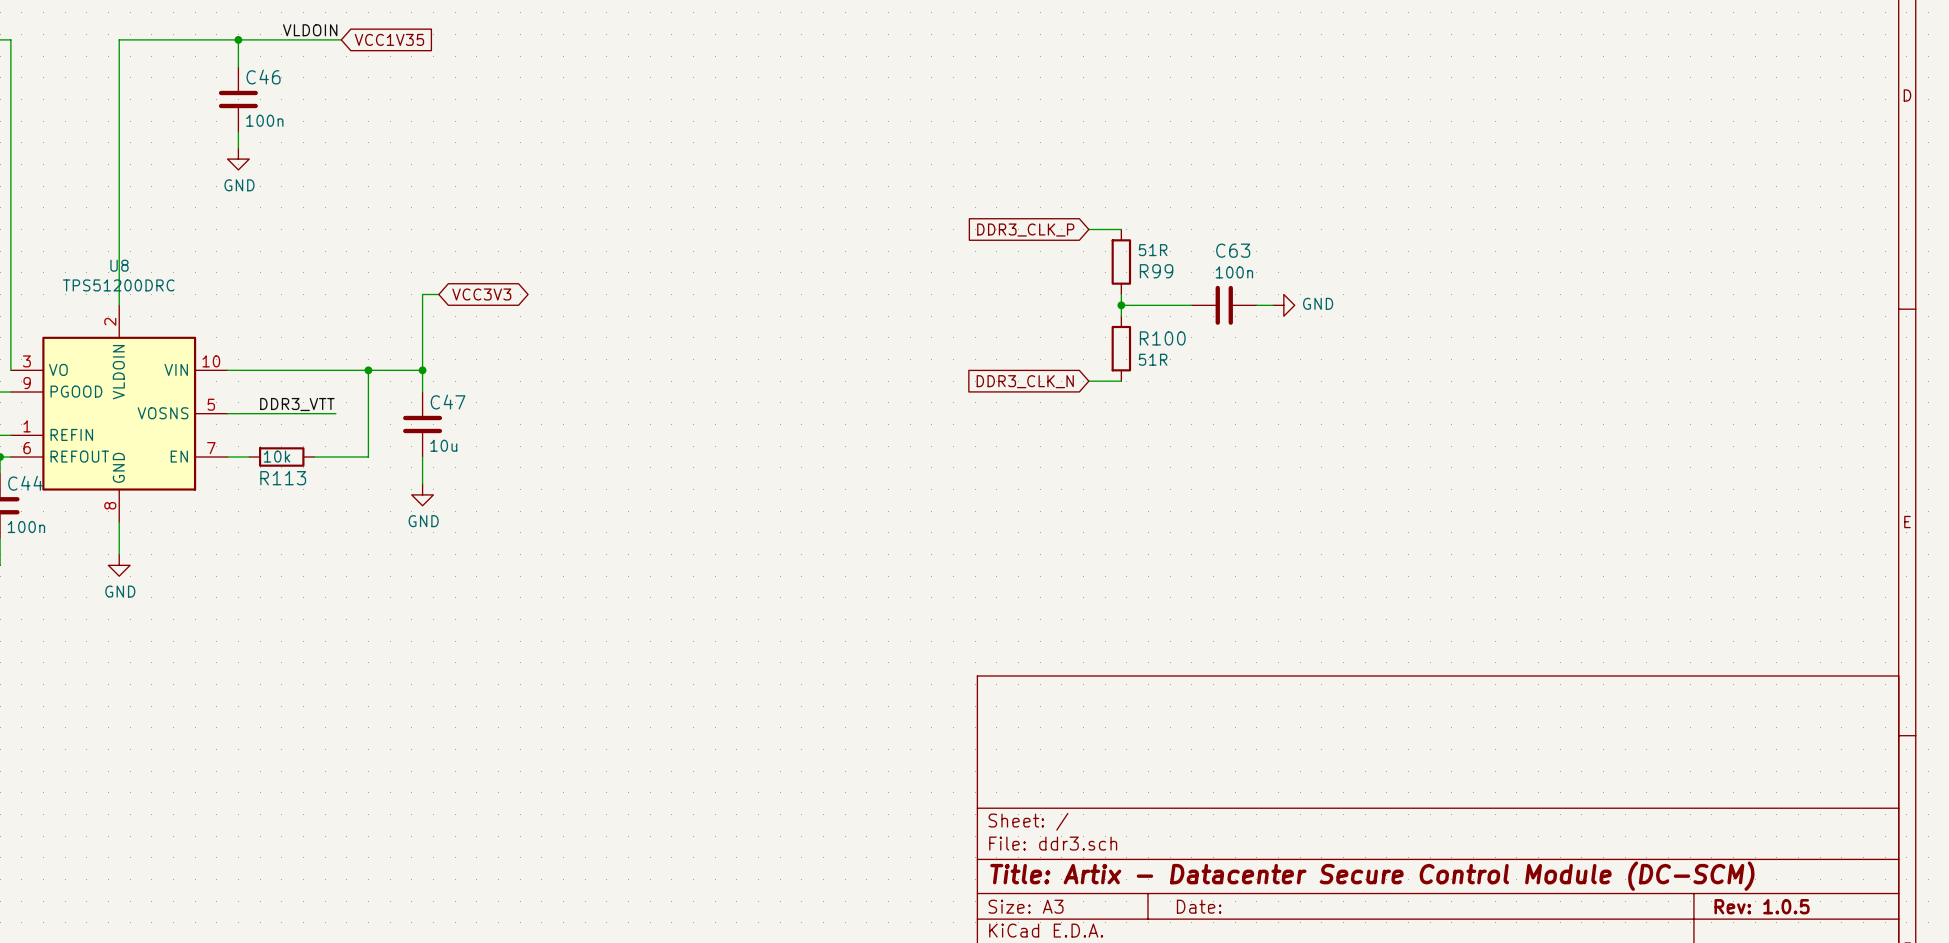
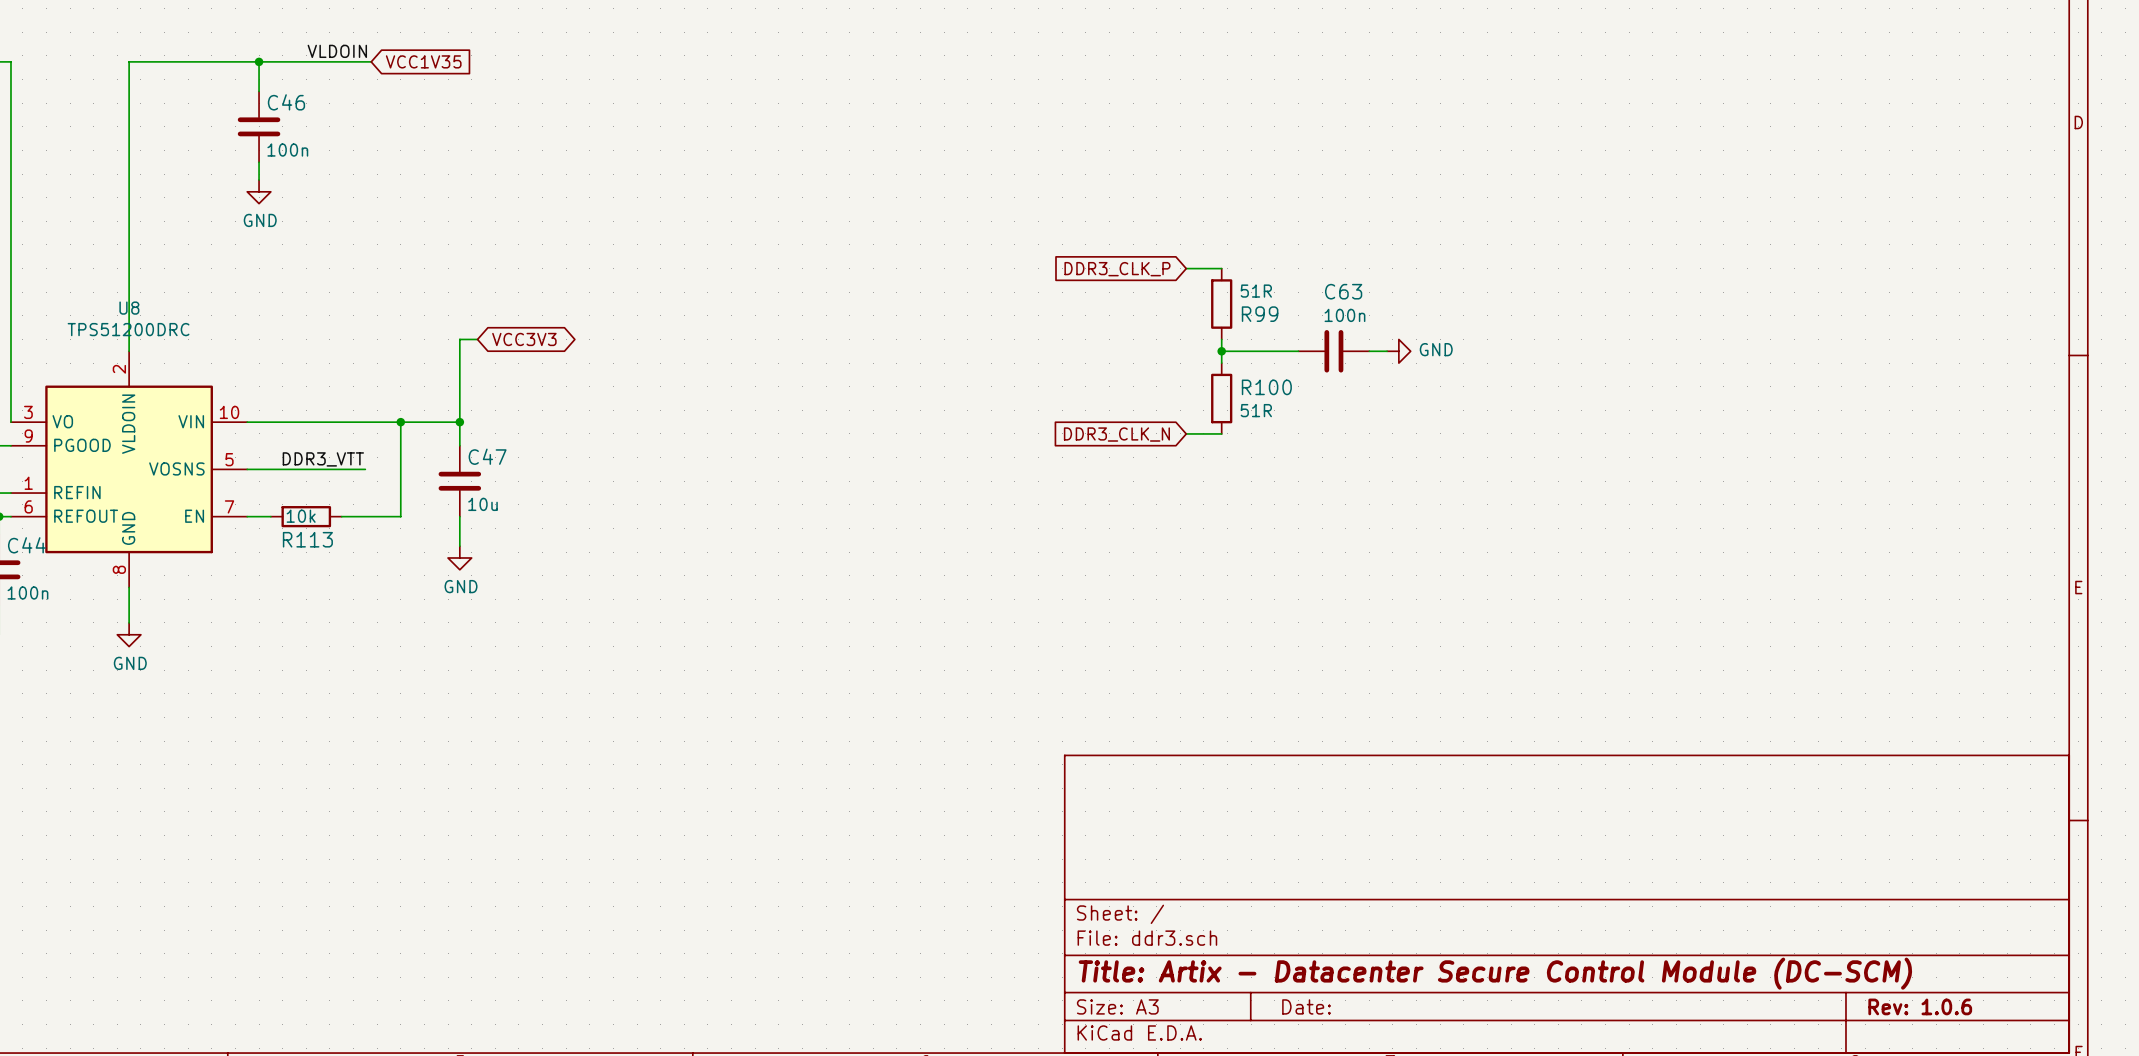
title block: Rev: 1.0.5 (1762, 906) -> Rev: 1.0.6 (1920, 1006)

